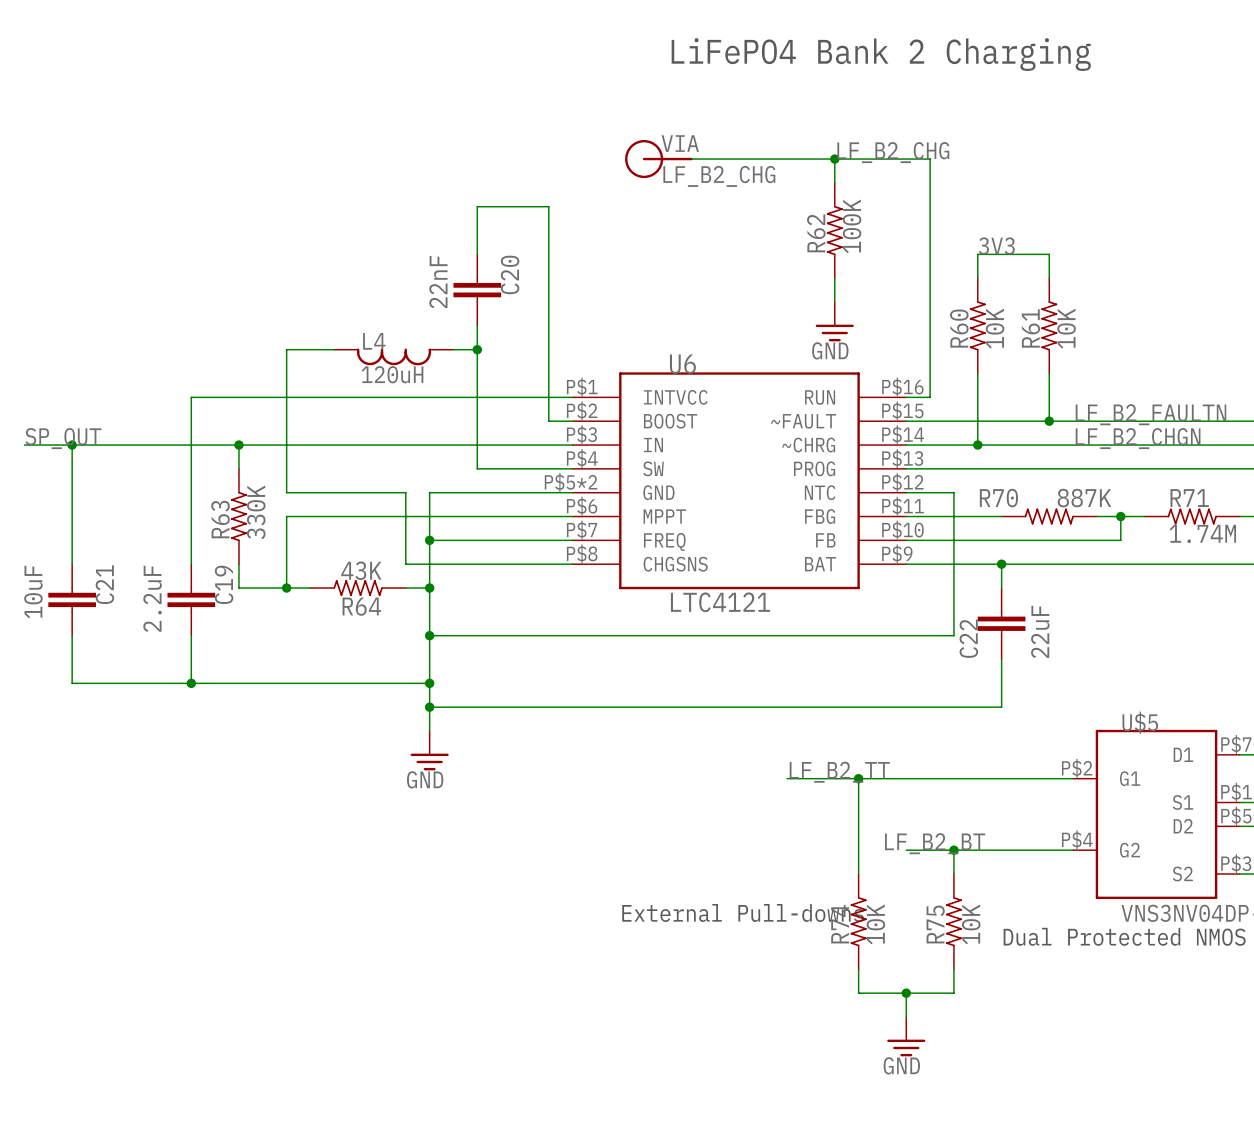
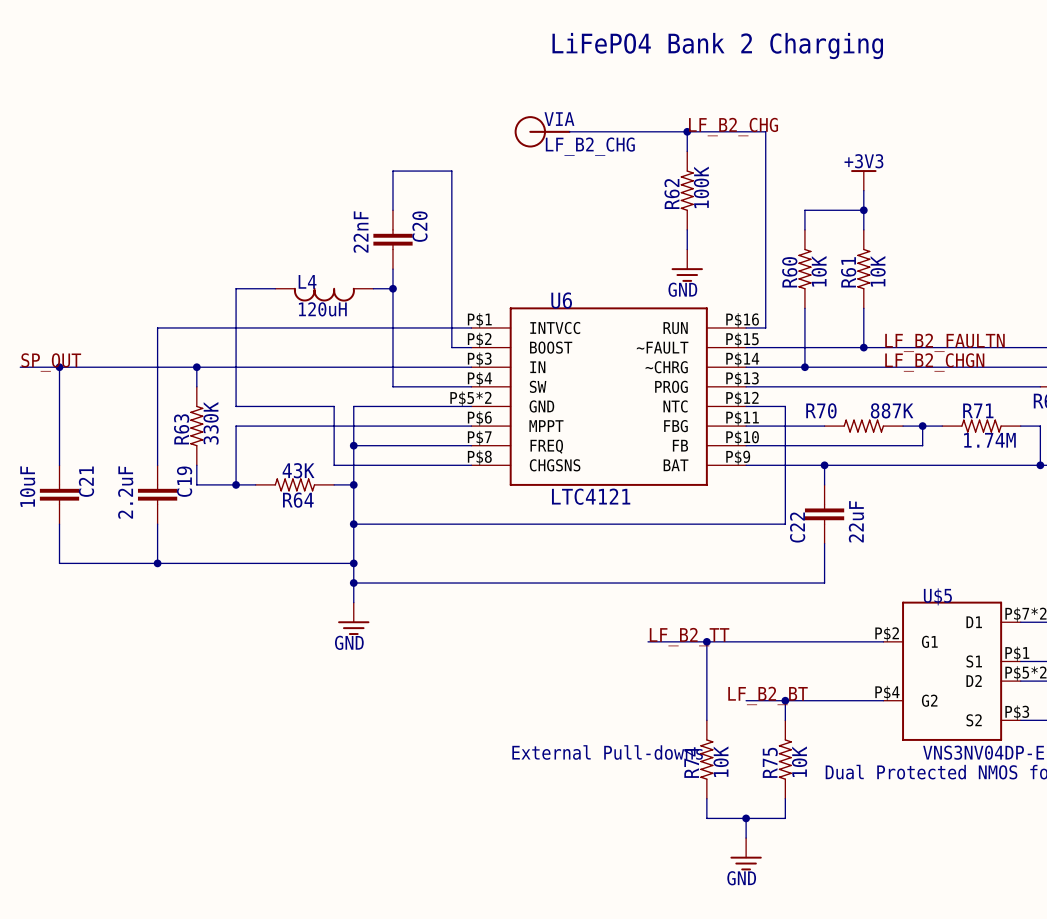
power symbol: none -> +3V3 (863, 180)
wire: none -> (863, 190) (863, 210)
label: 3V3 (996, 246) -> none
junction: none -> (863, 210)

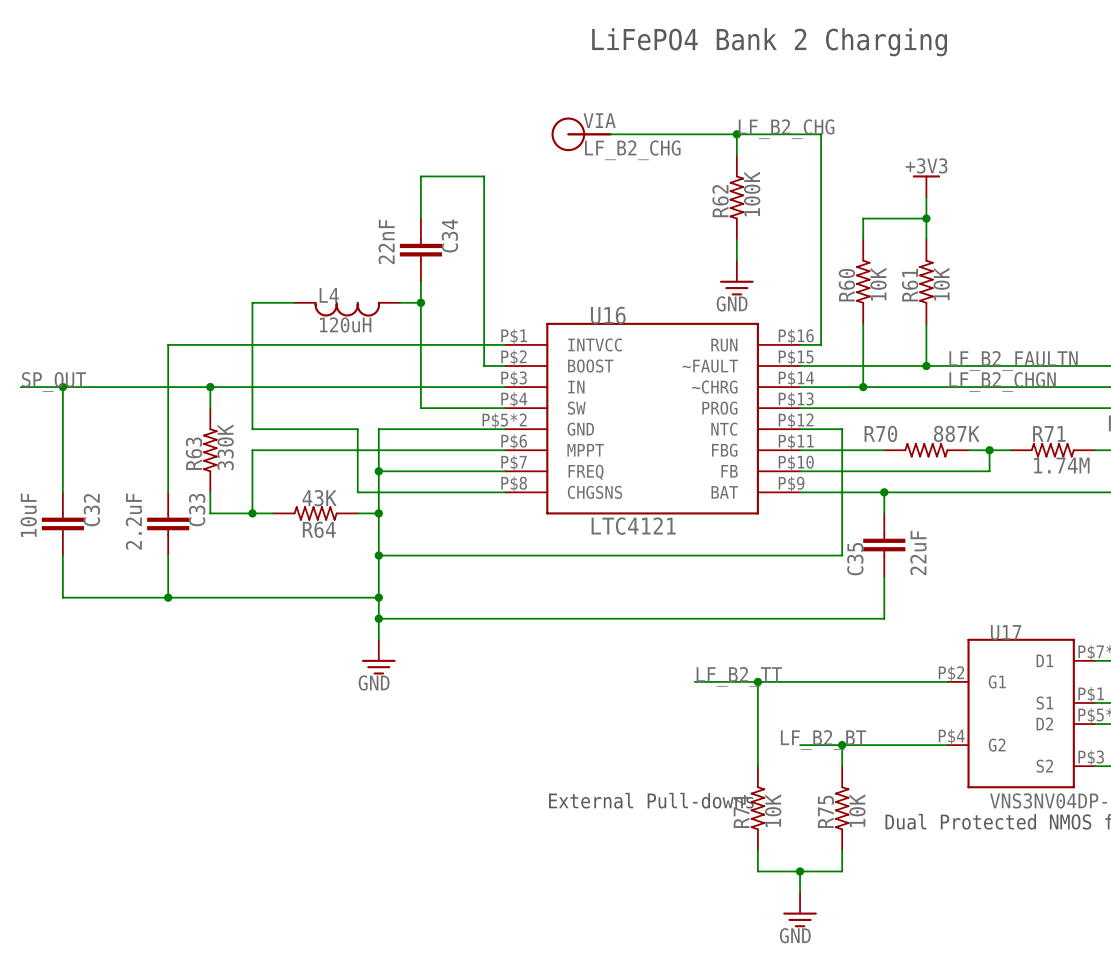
C20 name: C20 (419, 226) -> C34 (449, 235)
U6 name: U6 (561, 300) -> U16 (608, 315)
C21 name: C21 (86, 481) -> C32 (91, 510)
C19 name: C19 (184, 481) -> C33 (197, 510)
C22 name: C22 (797, 527) -> C35 (855, 559)
U$5 name: U$5 (937, 596) -> U17 (1005, 632)

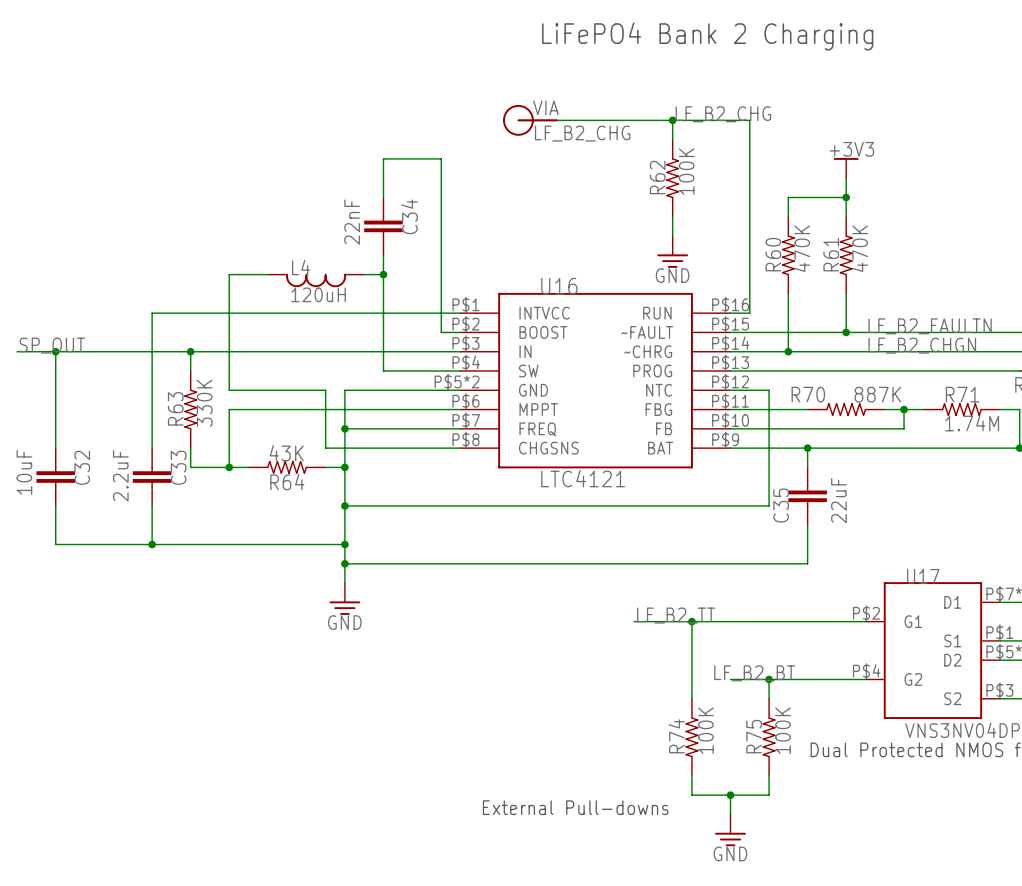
R60 value: 10K (878, 284) -> 470K (801, 248)
R61 value: 10K (941, 284) -> 470K (859, 248)
text position: External Pull-downs (651, 800) -> External Pull-downs (575, 807)
R74 value: 10K (773, 810) -> 100K (705, 730)
R75 value: 10K (857, 810) -> 100K (783, 730)

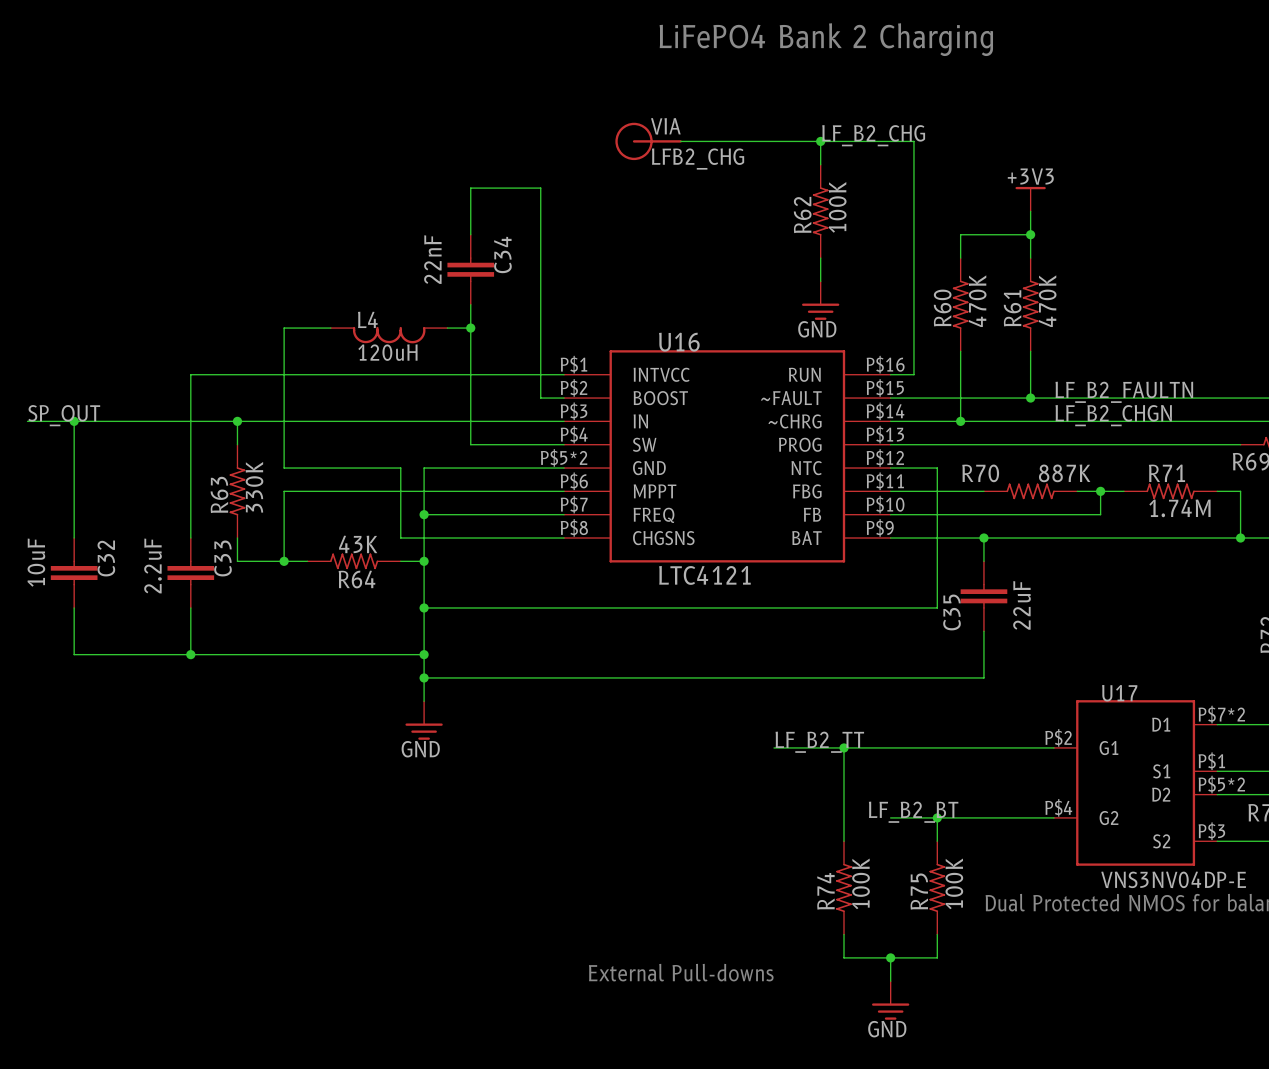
part value: LF_B2_CHG (582, 133) -> LFB2_CHG (698, 159)

